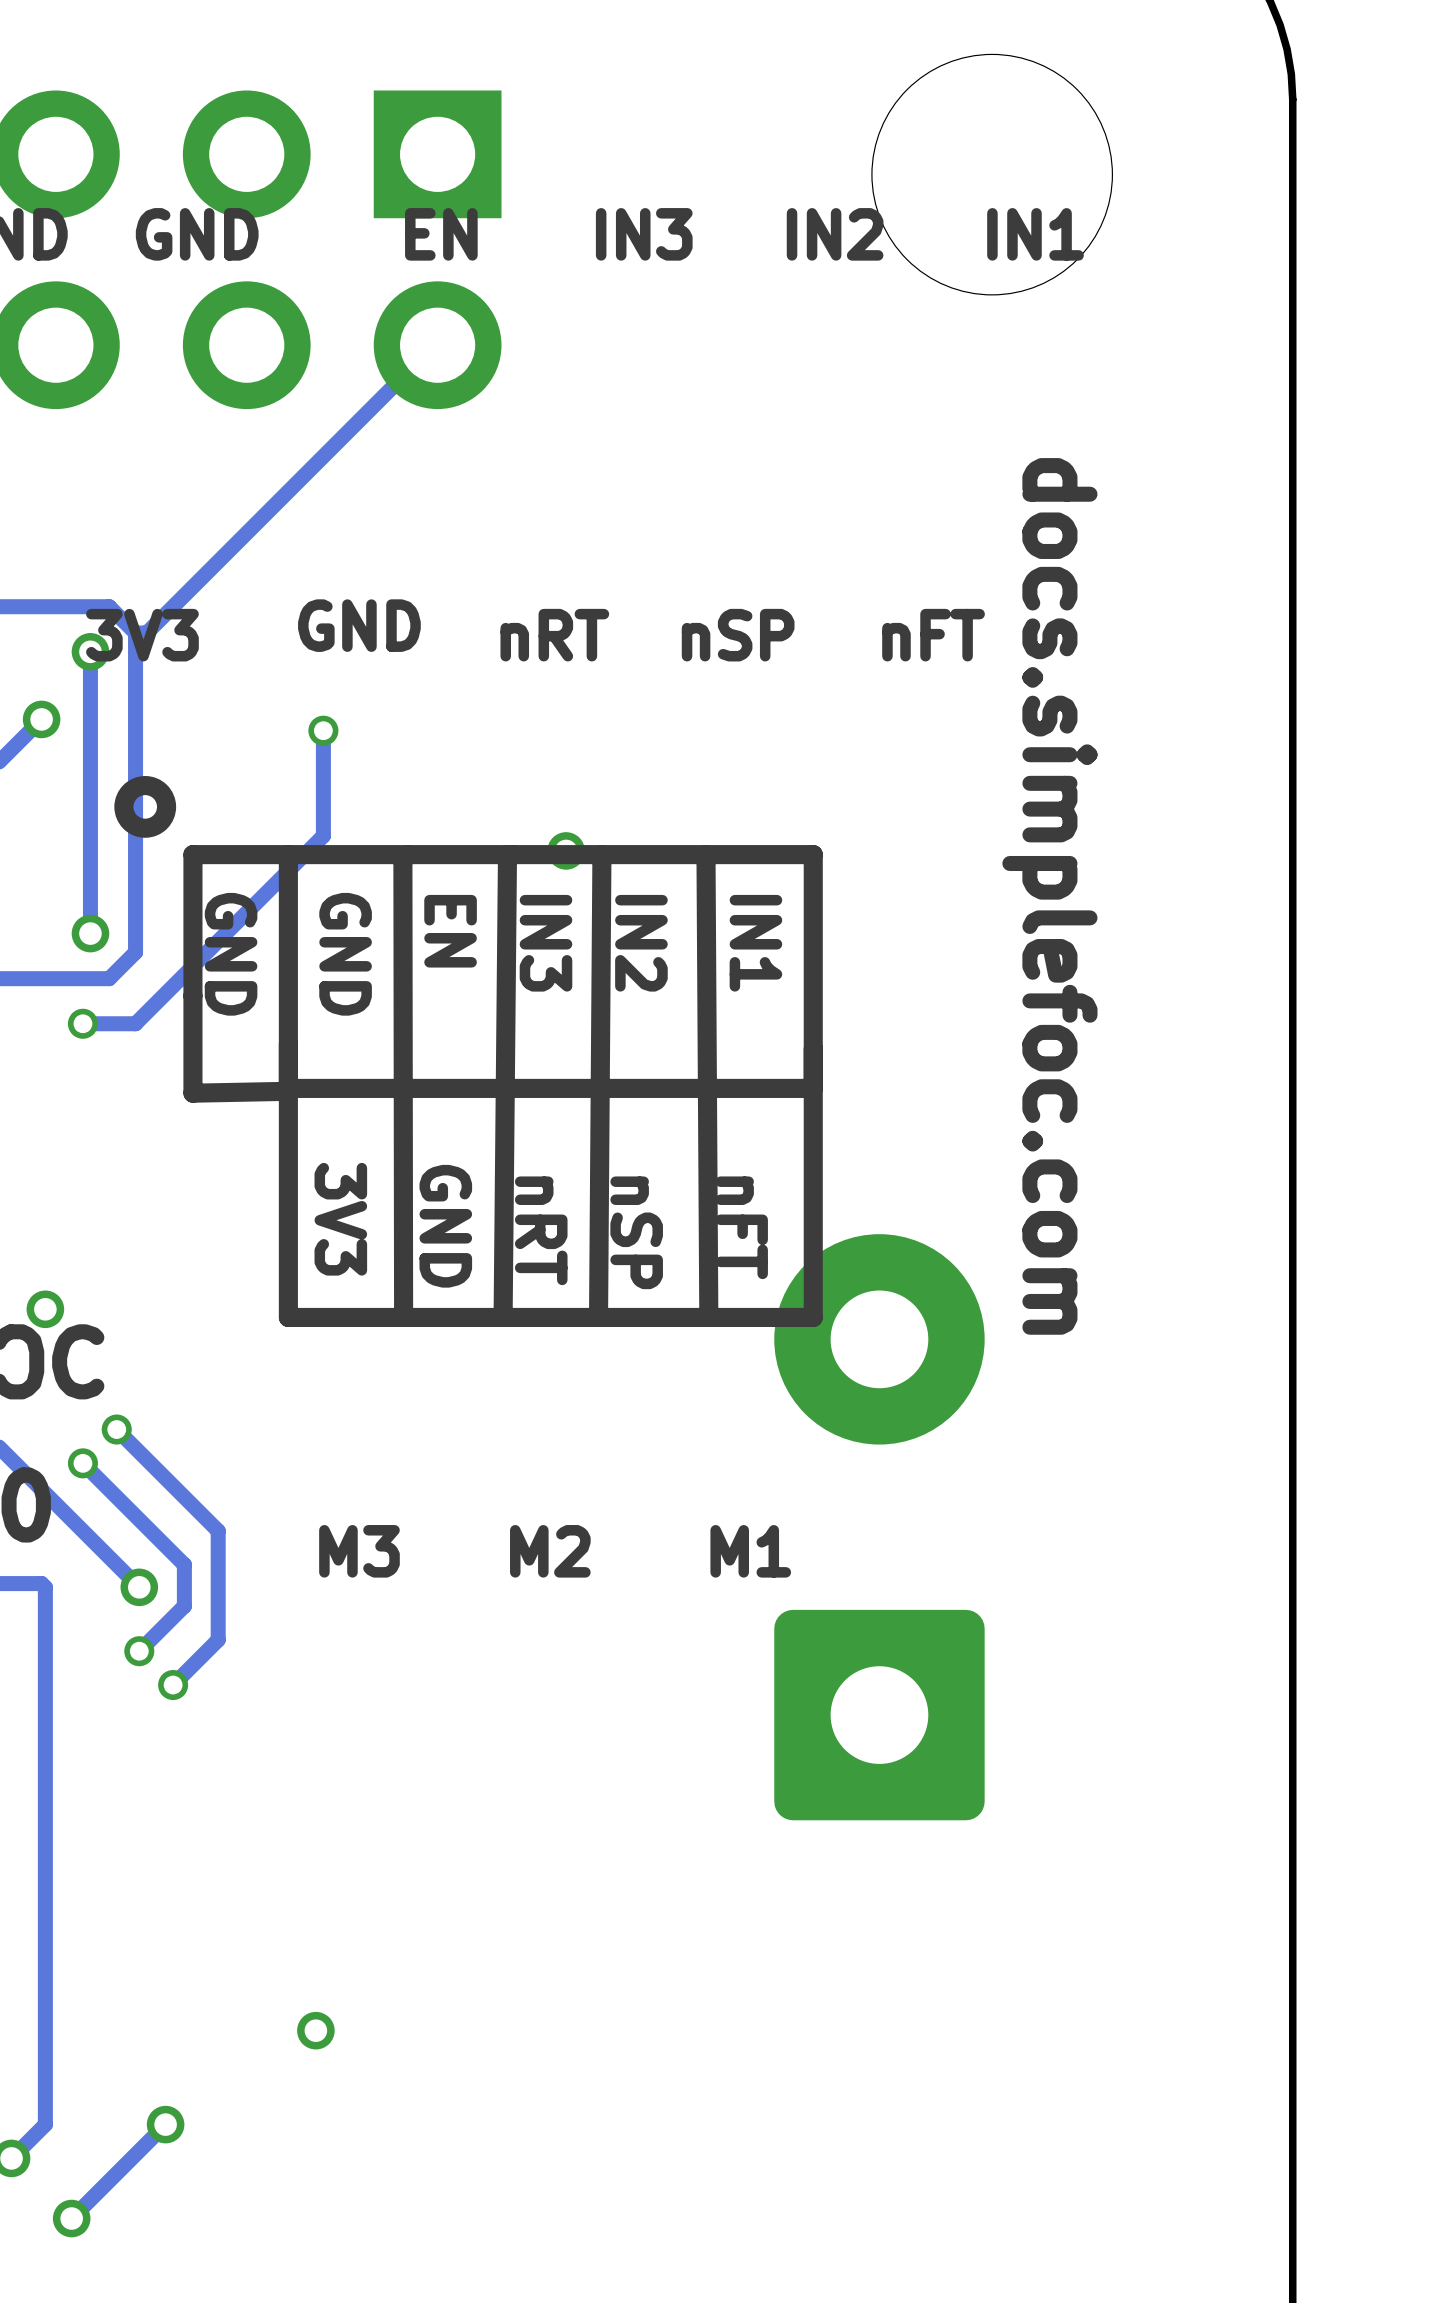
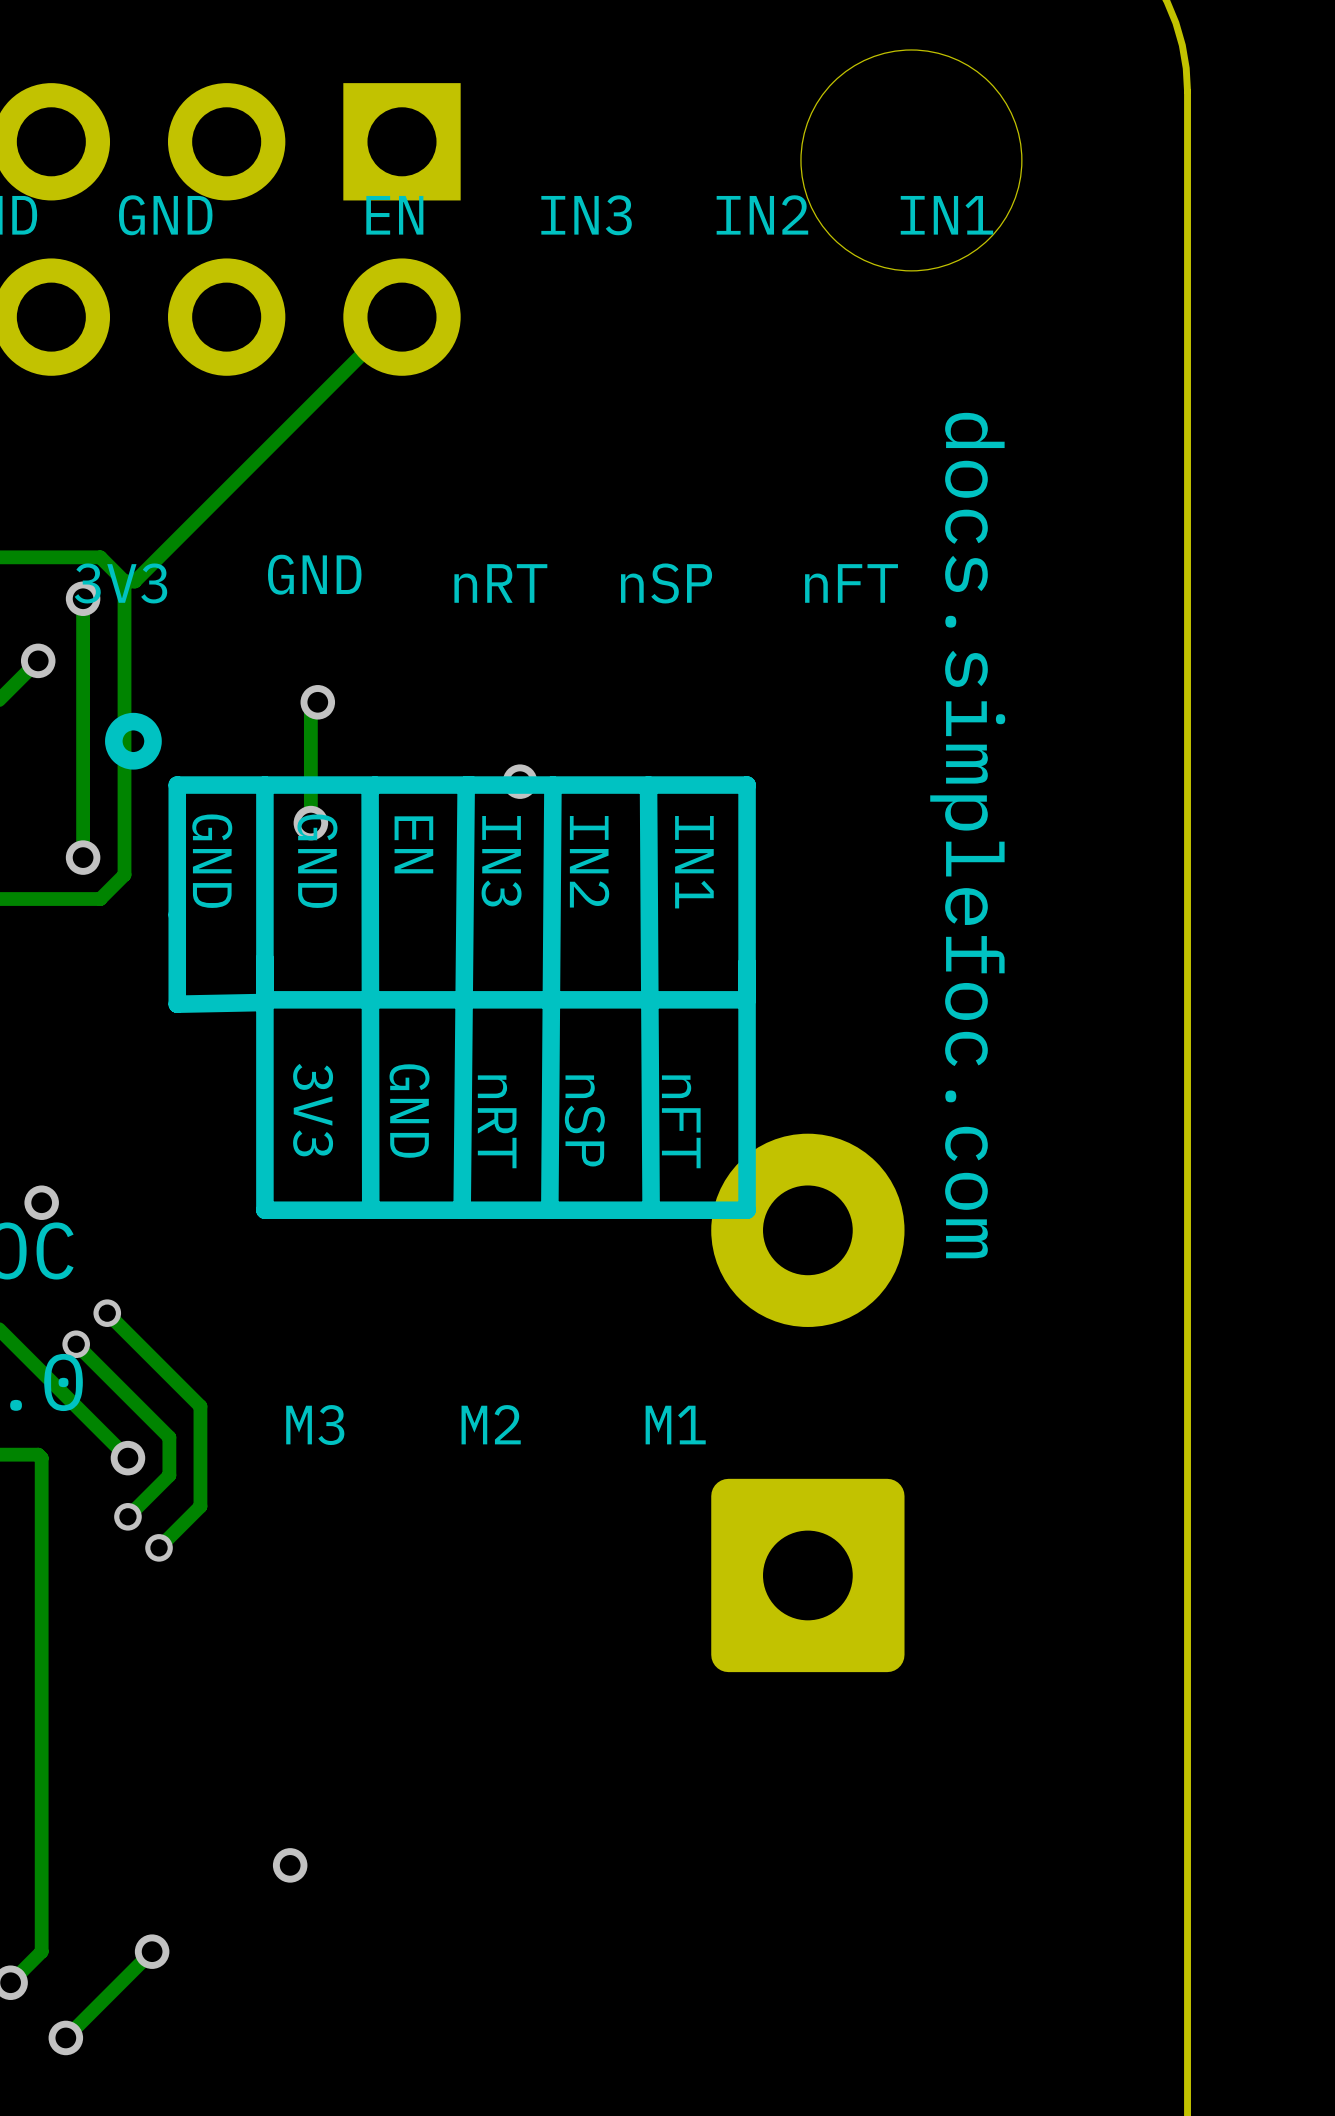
track: (323, 730) (323, 835) (135, 1023) (82, 1023) -> none
via position: (323, 730) -> (317, 702)
track: none -> (317, 702) (310, 709) (310, 823)
via: none -> (310, 823)
via: (82, 1023) -> none

